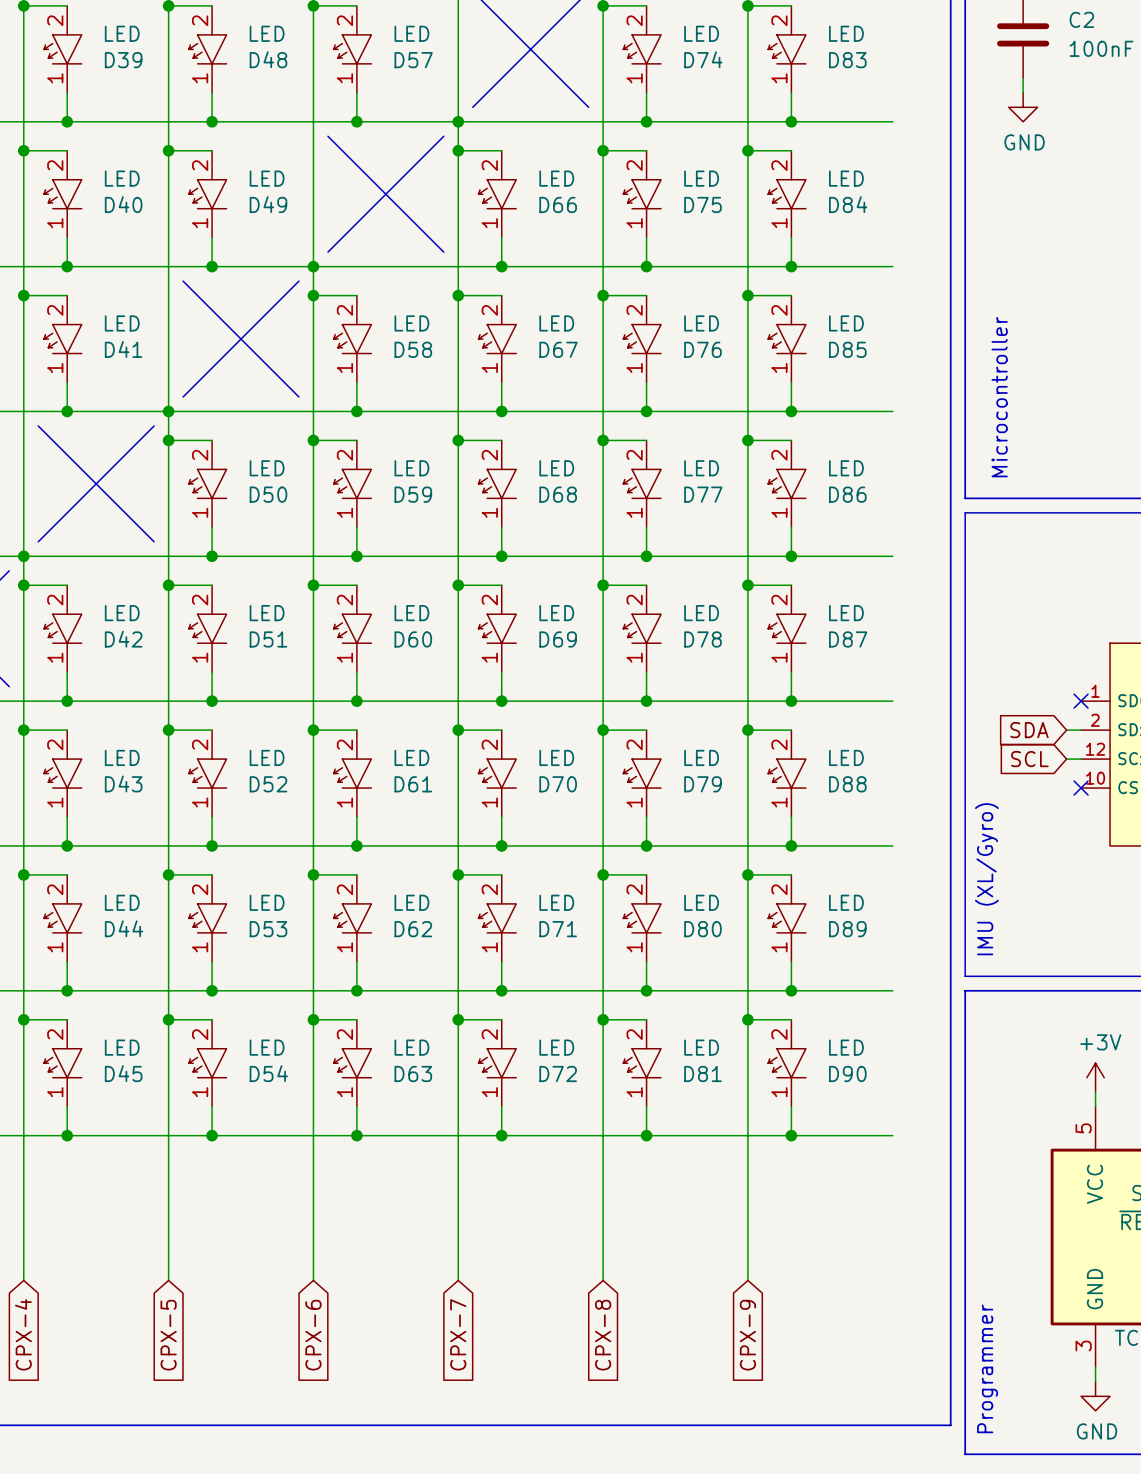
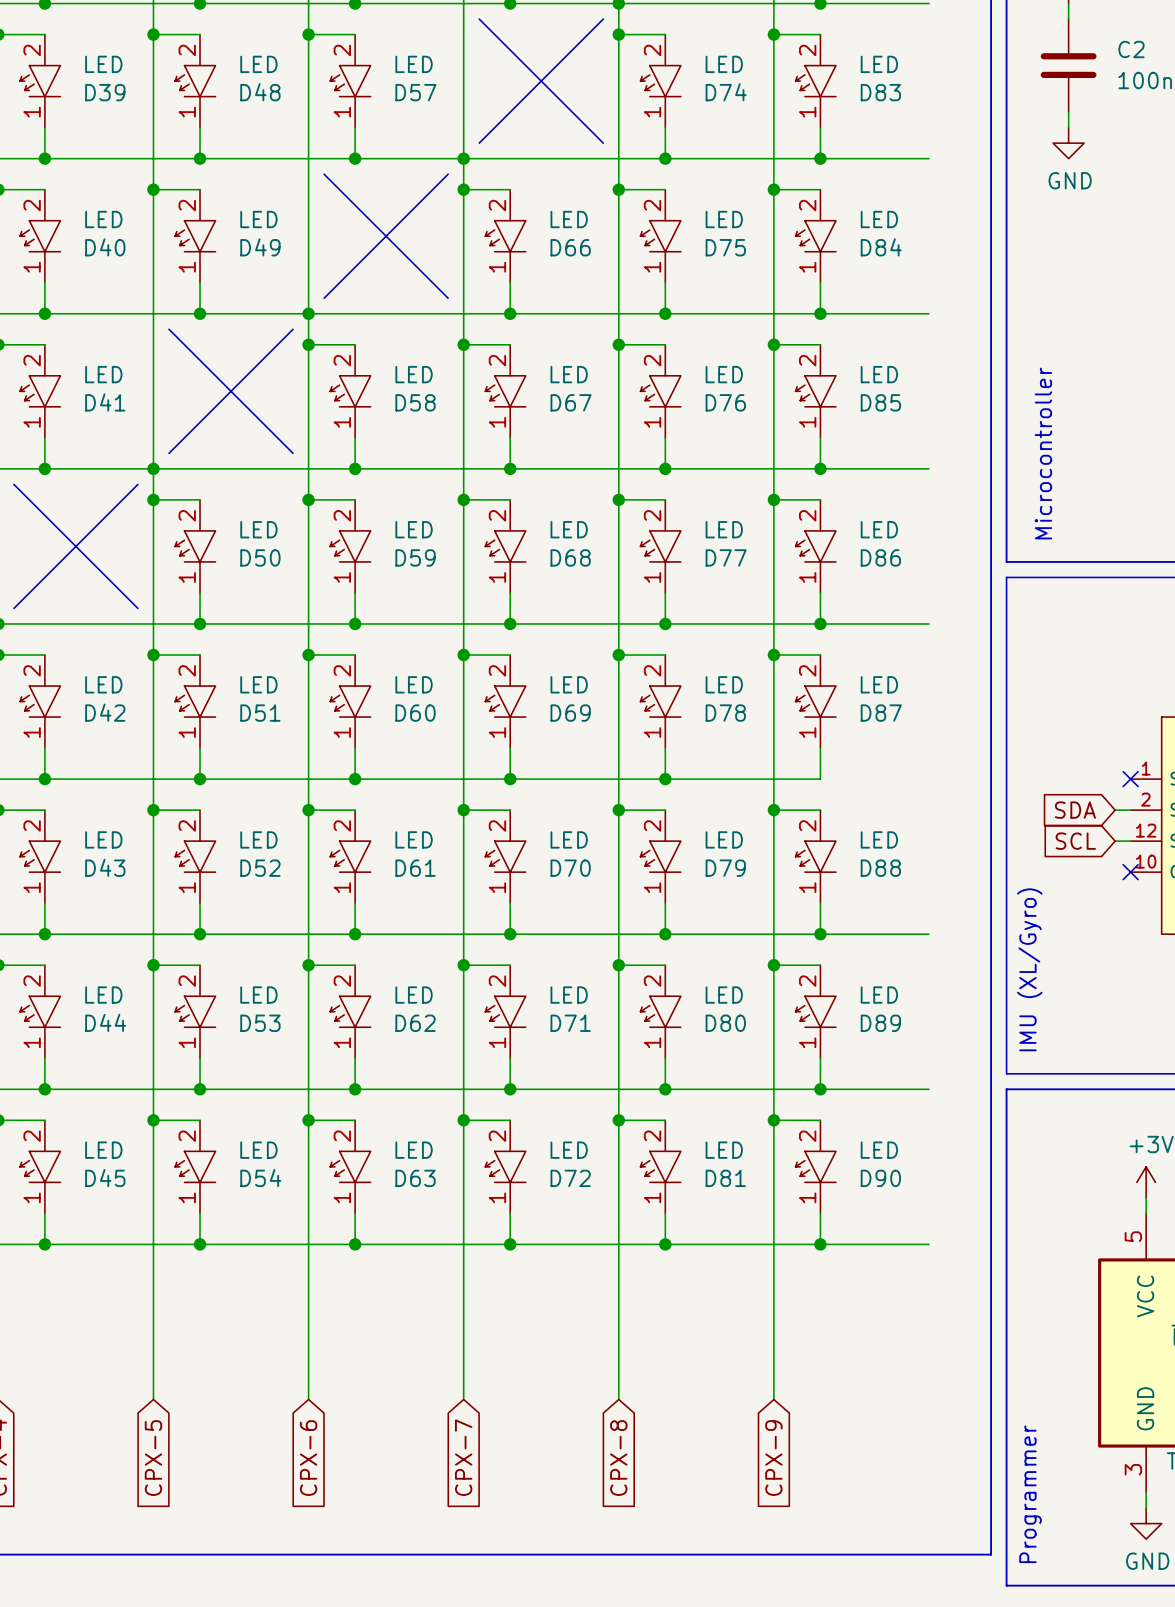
wire: (791, 701) (892, 701) -> none
junction: (791, 701) -> none

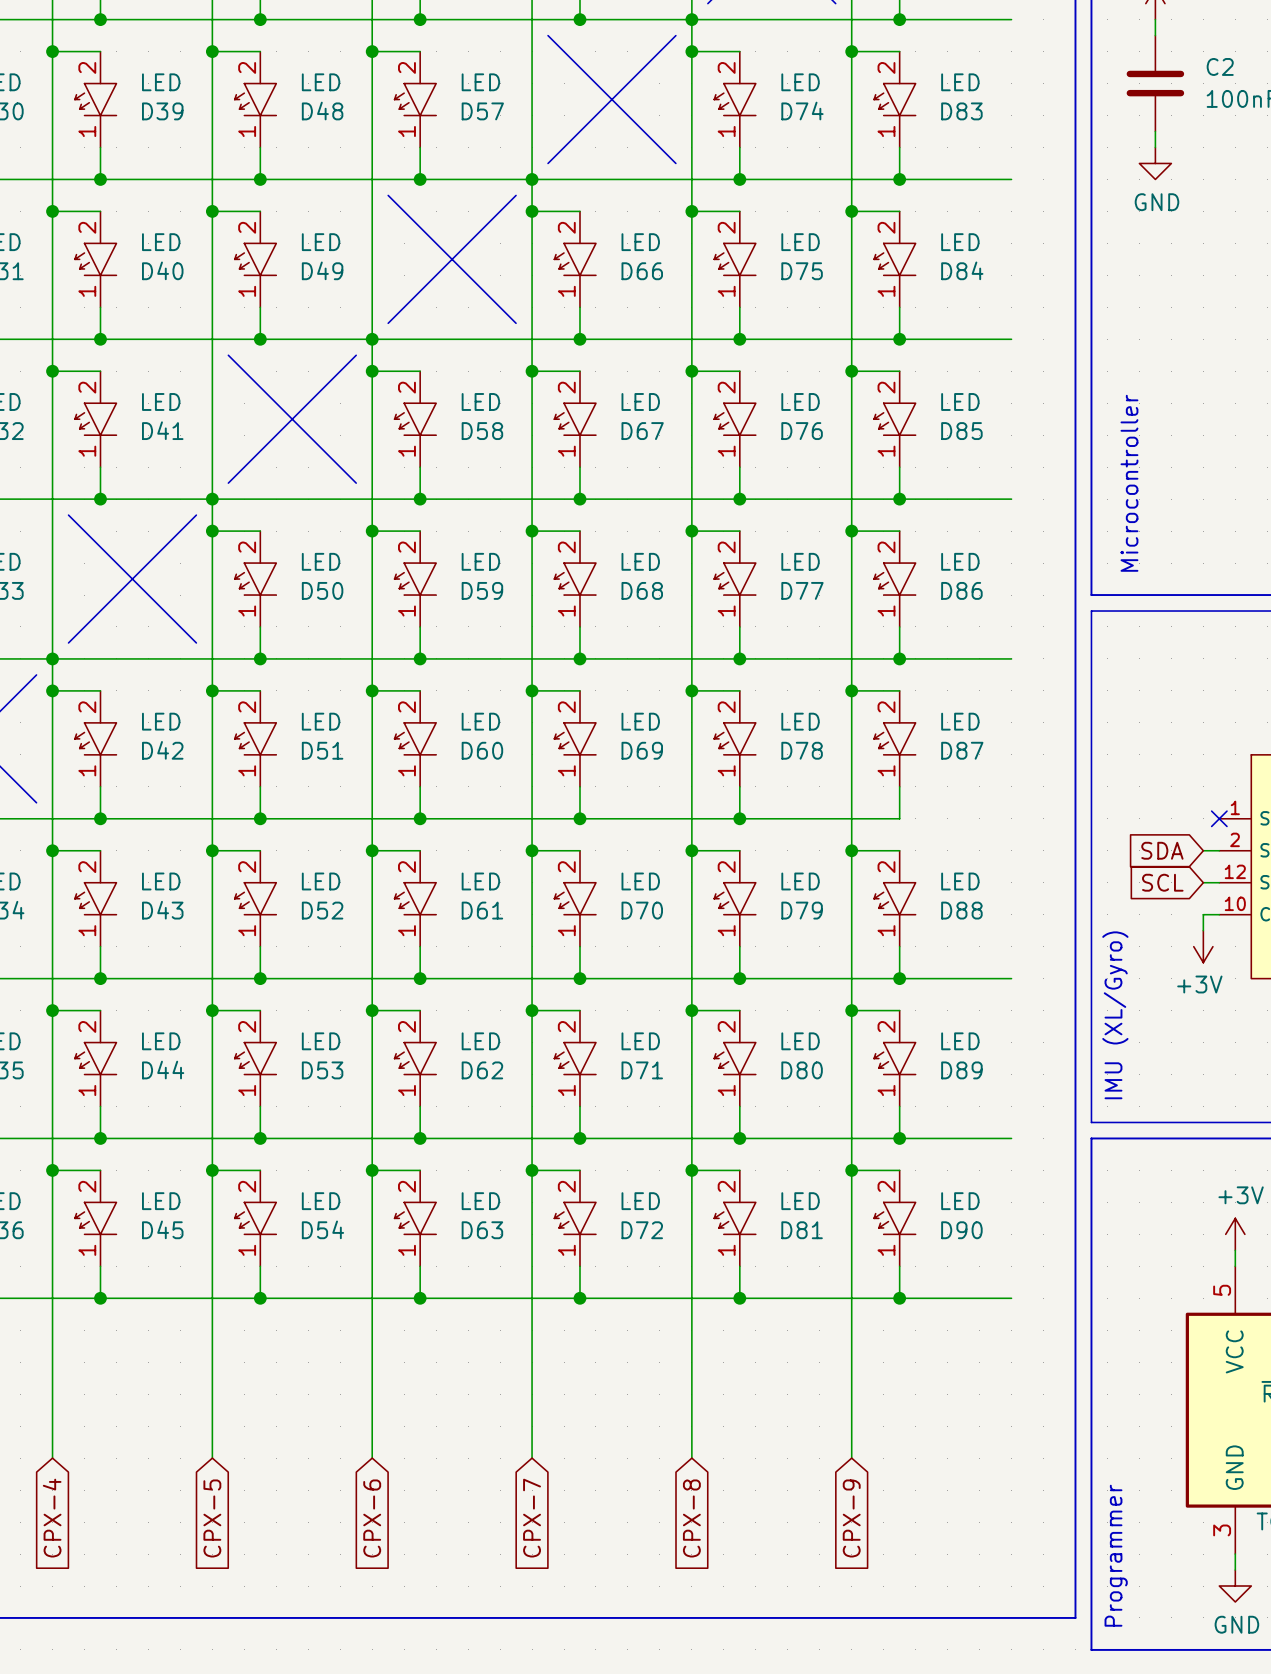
wire: none -> (1219, 914) (1203, 914) (1203, 930)
no-connect mark: (1130, 872) -> none
power symbol: none -> +3V (1203, 946)

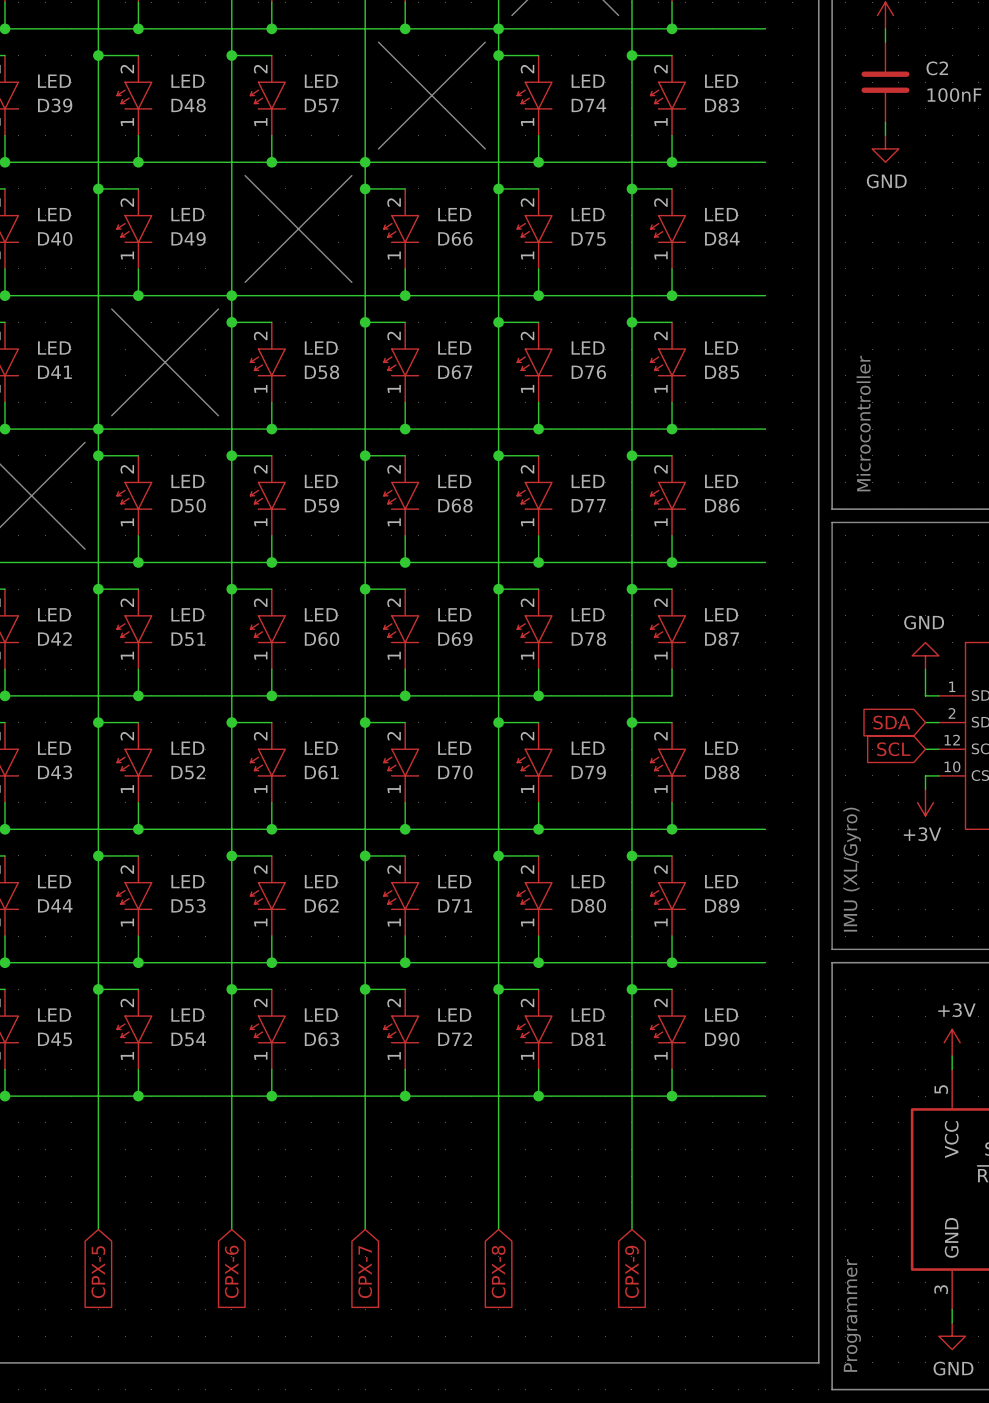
power symbol: none -> GND (925, 655)
wire: none -> (925, 669) (925, 695) (938, 695)
no-connect mark: (1219, 818) -> none

